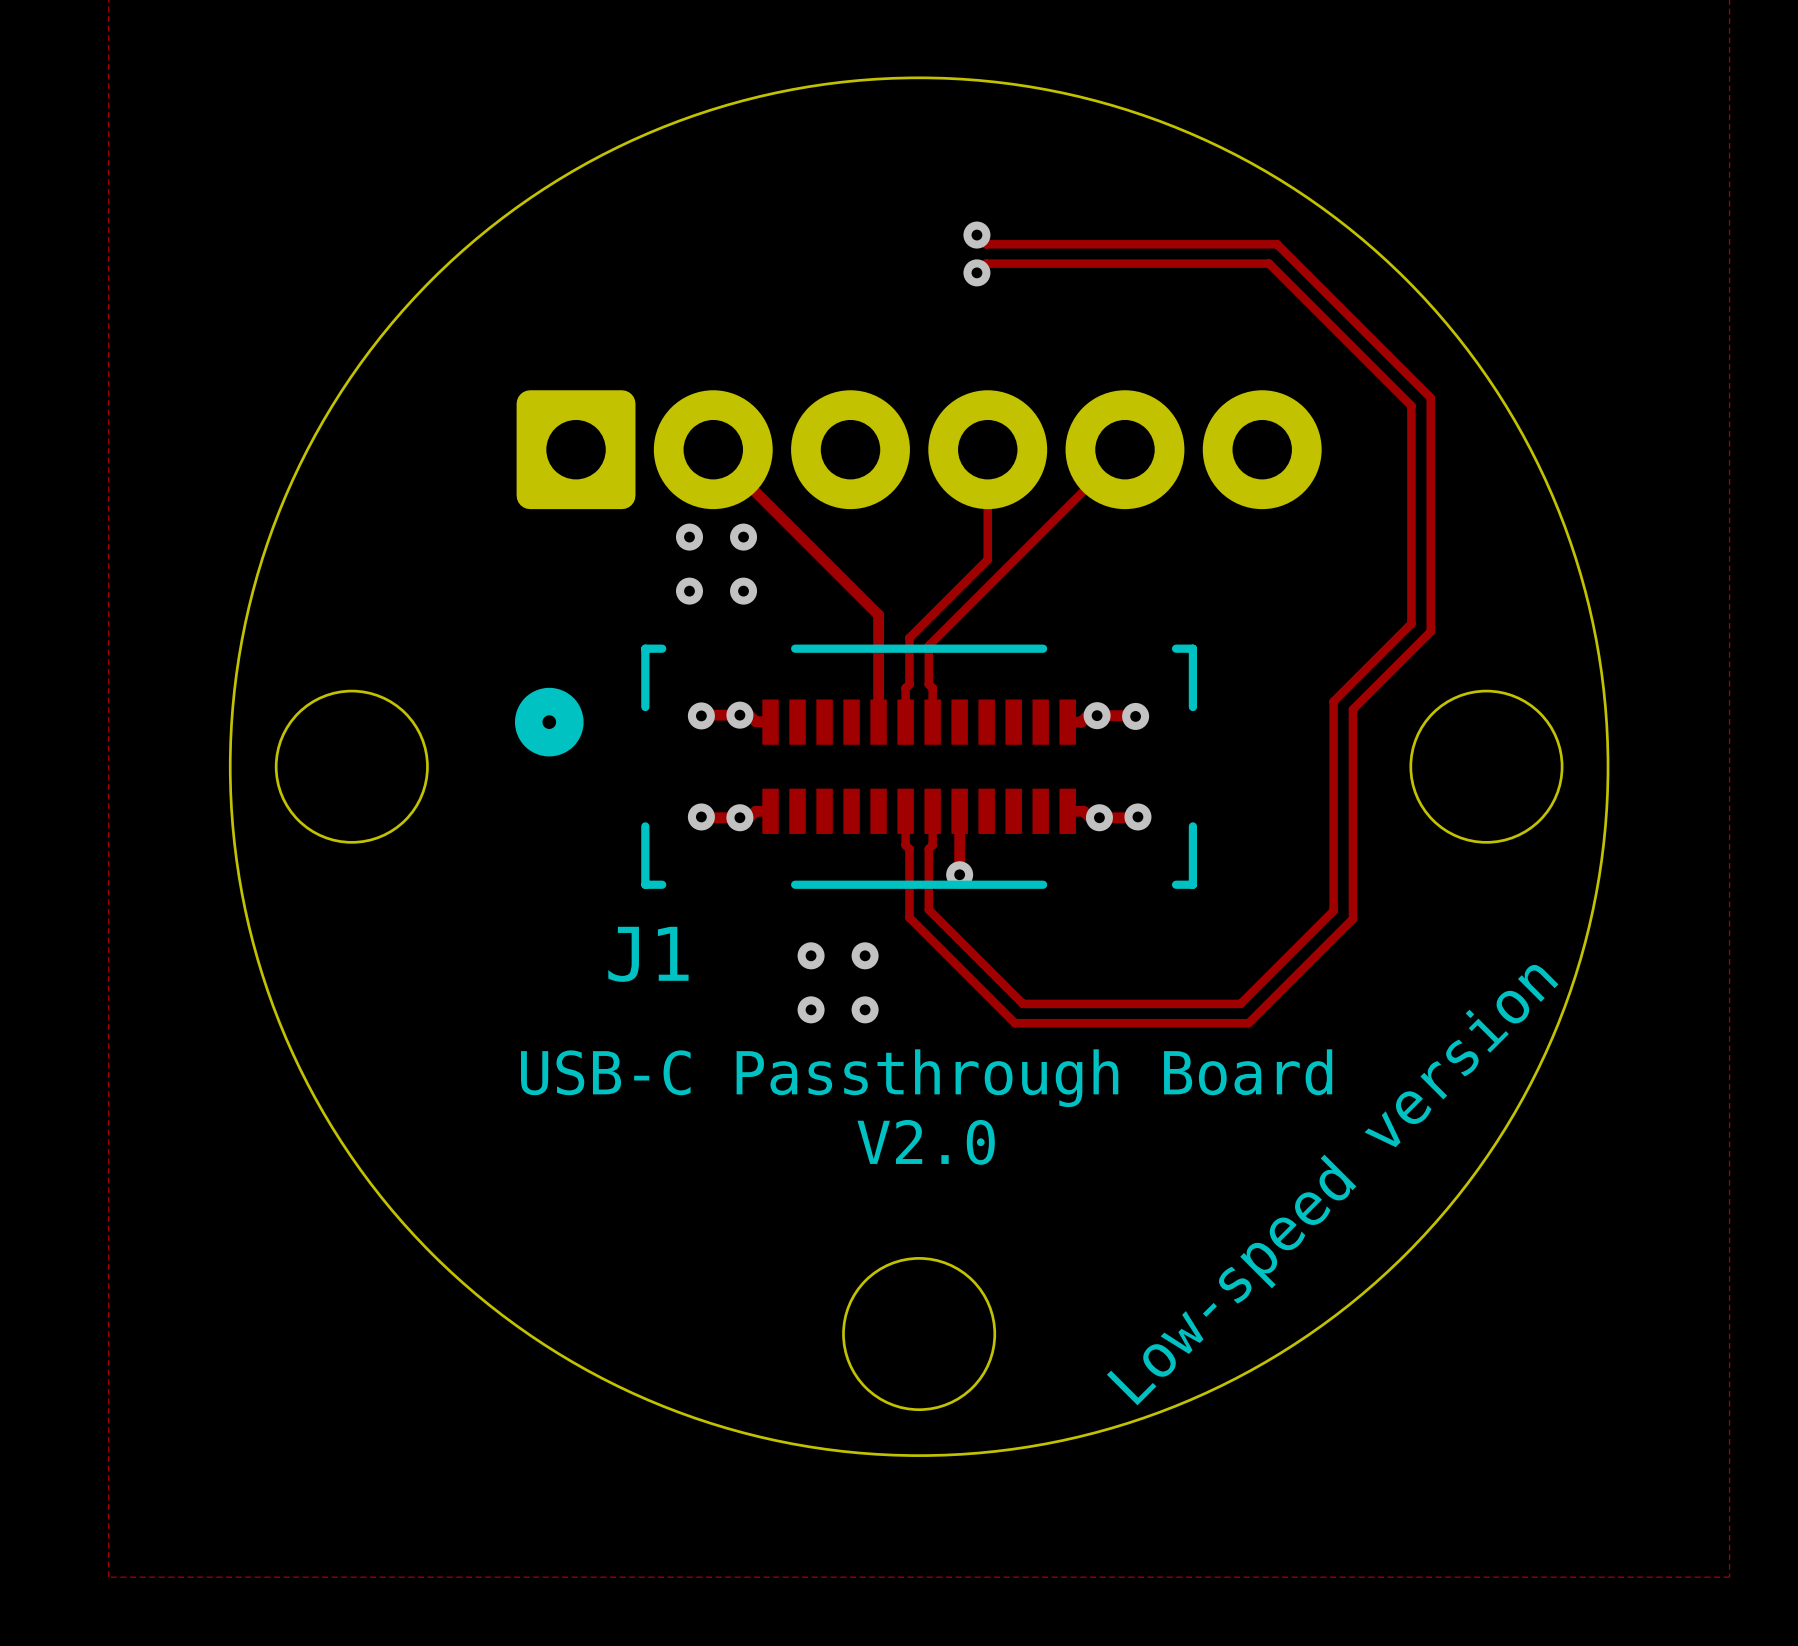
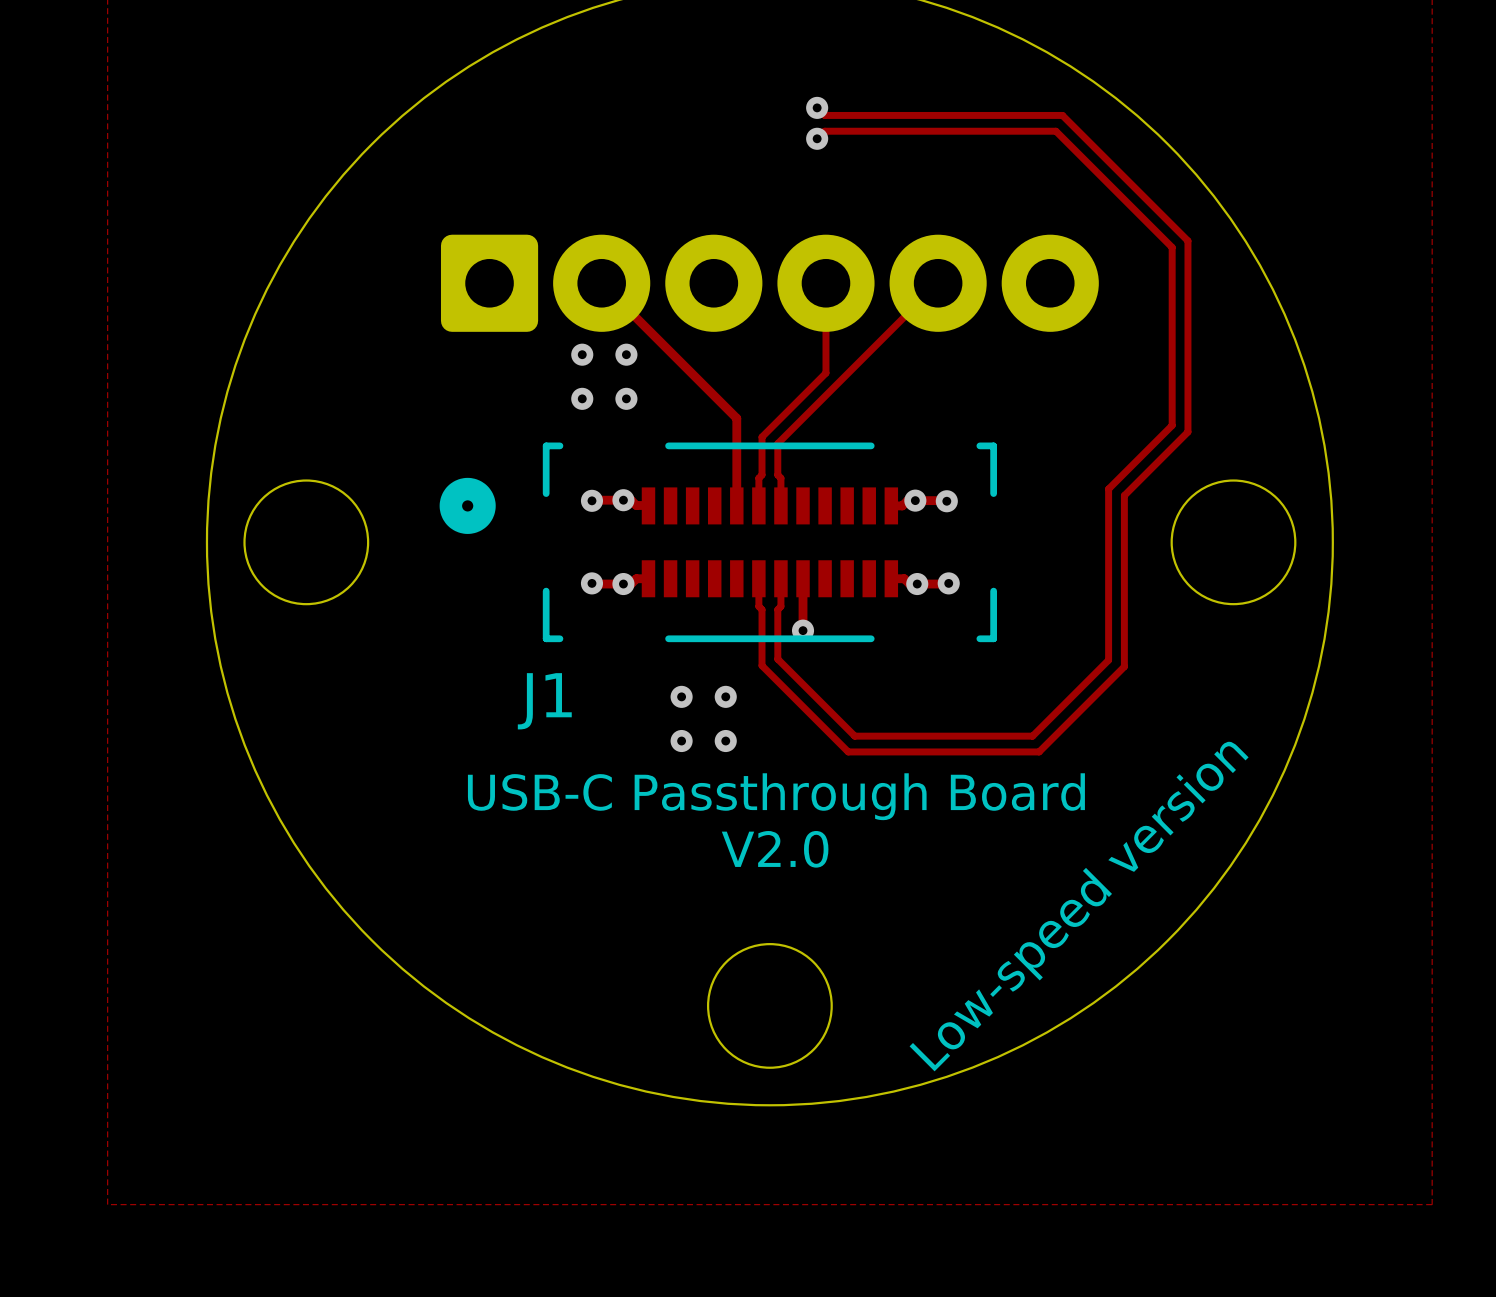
text position: Low-speed version (1332, 1184) -> Low-speed version (1079, 906)

